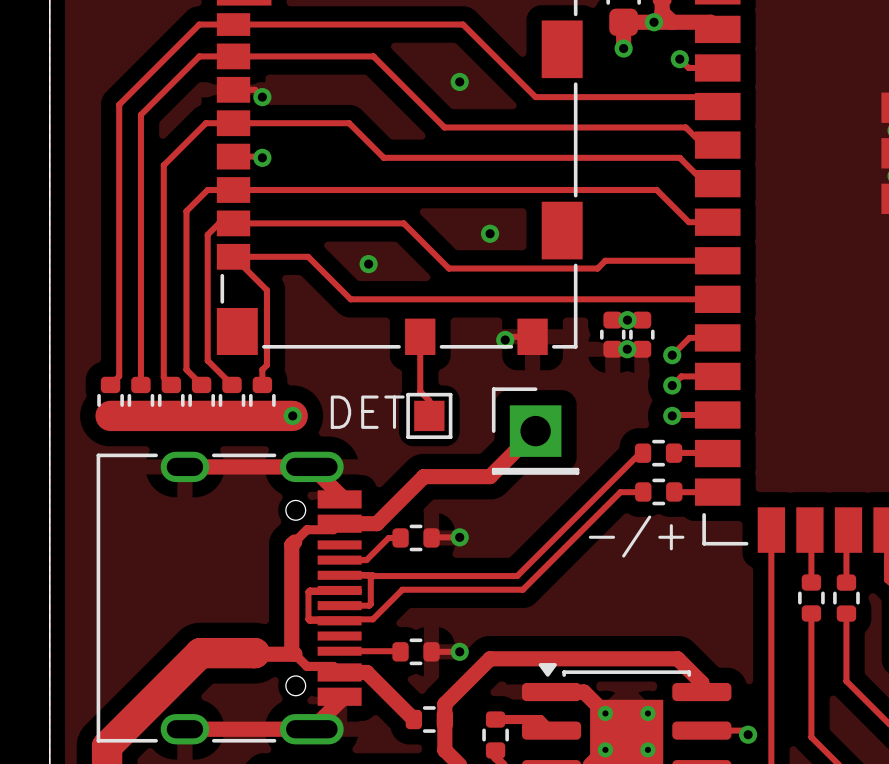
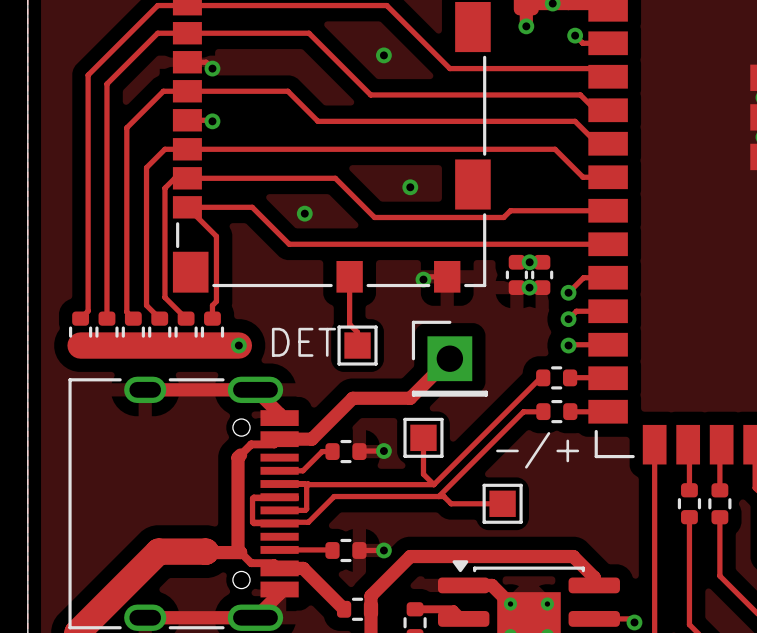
track: none -> (423, 437) (423, 474) (433, 484)
part: none -> (423, 437)
track: none -> (438, 496) (443, 496) (451, 503) (502, 503)
part: none -> (502, 503)

